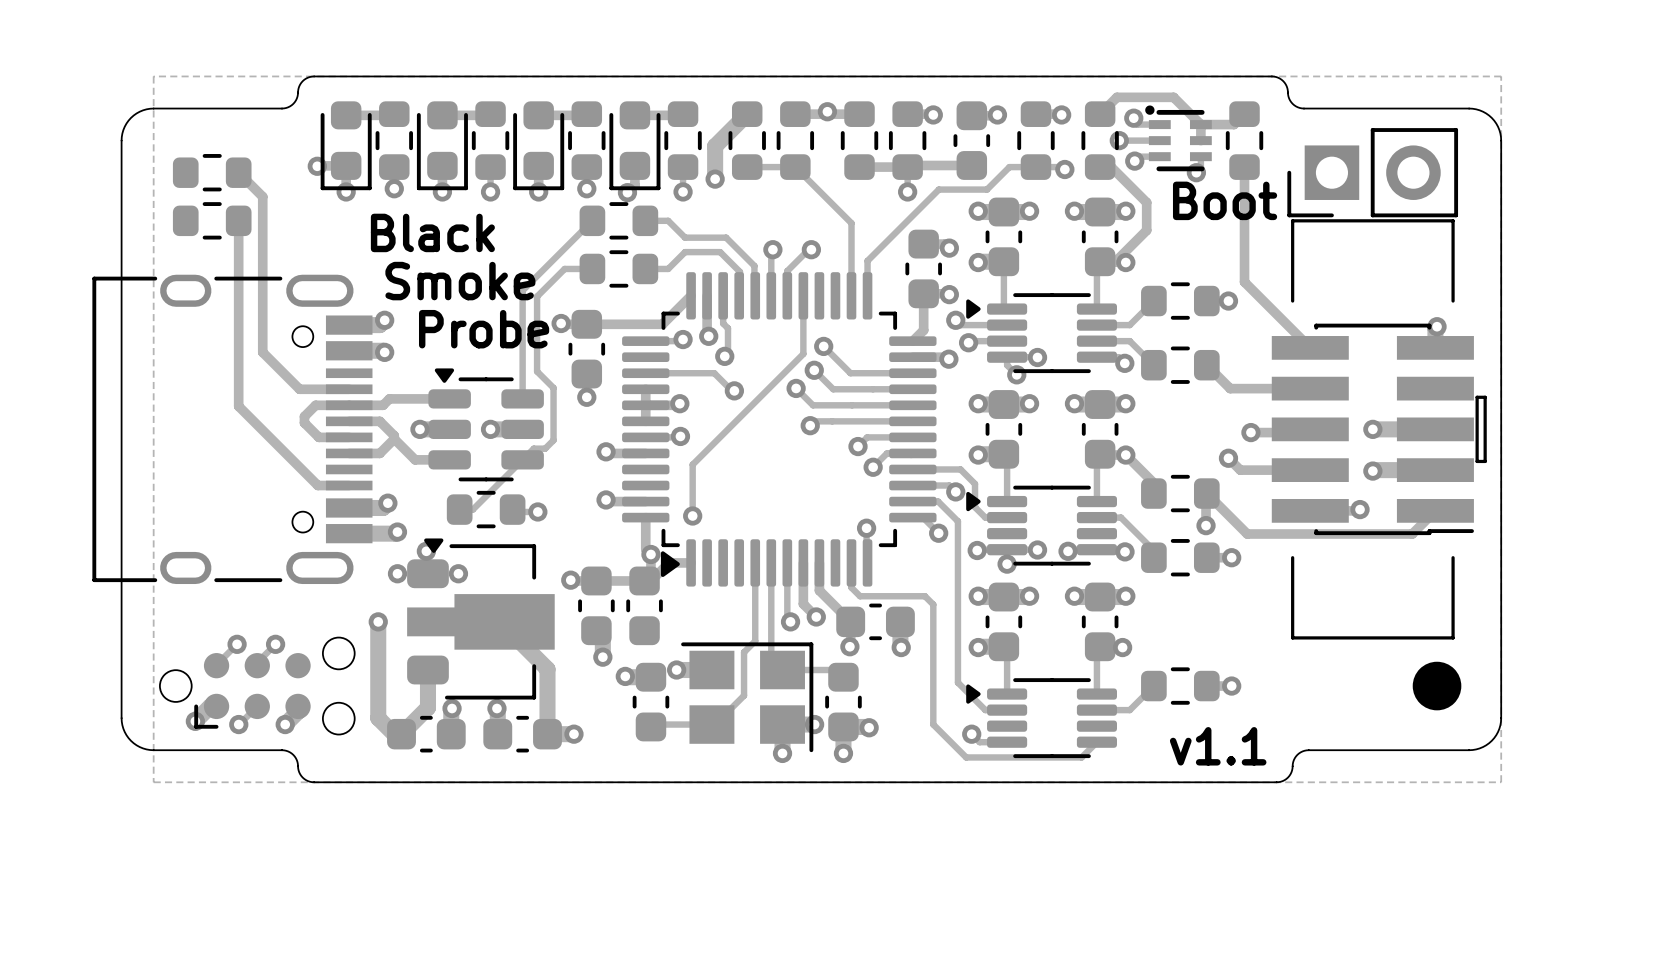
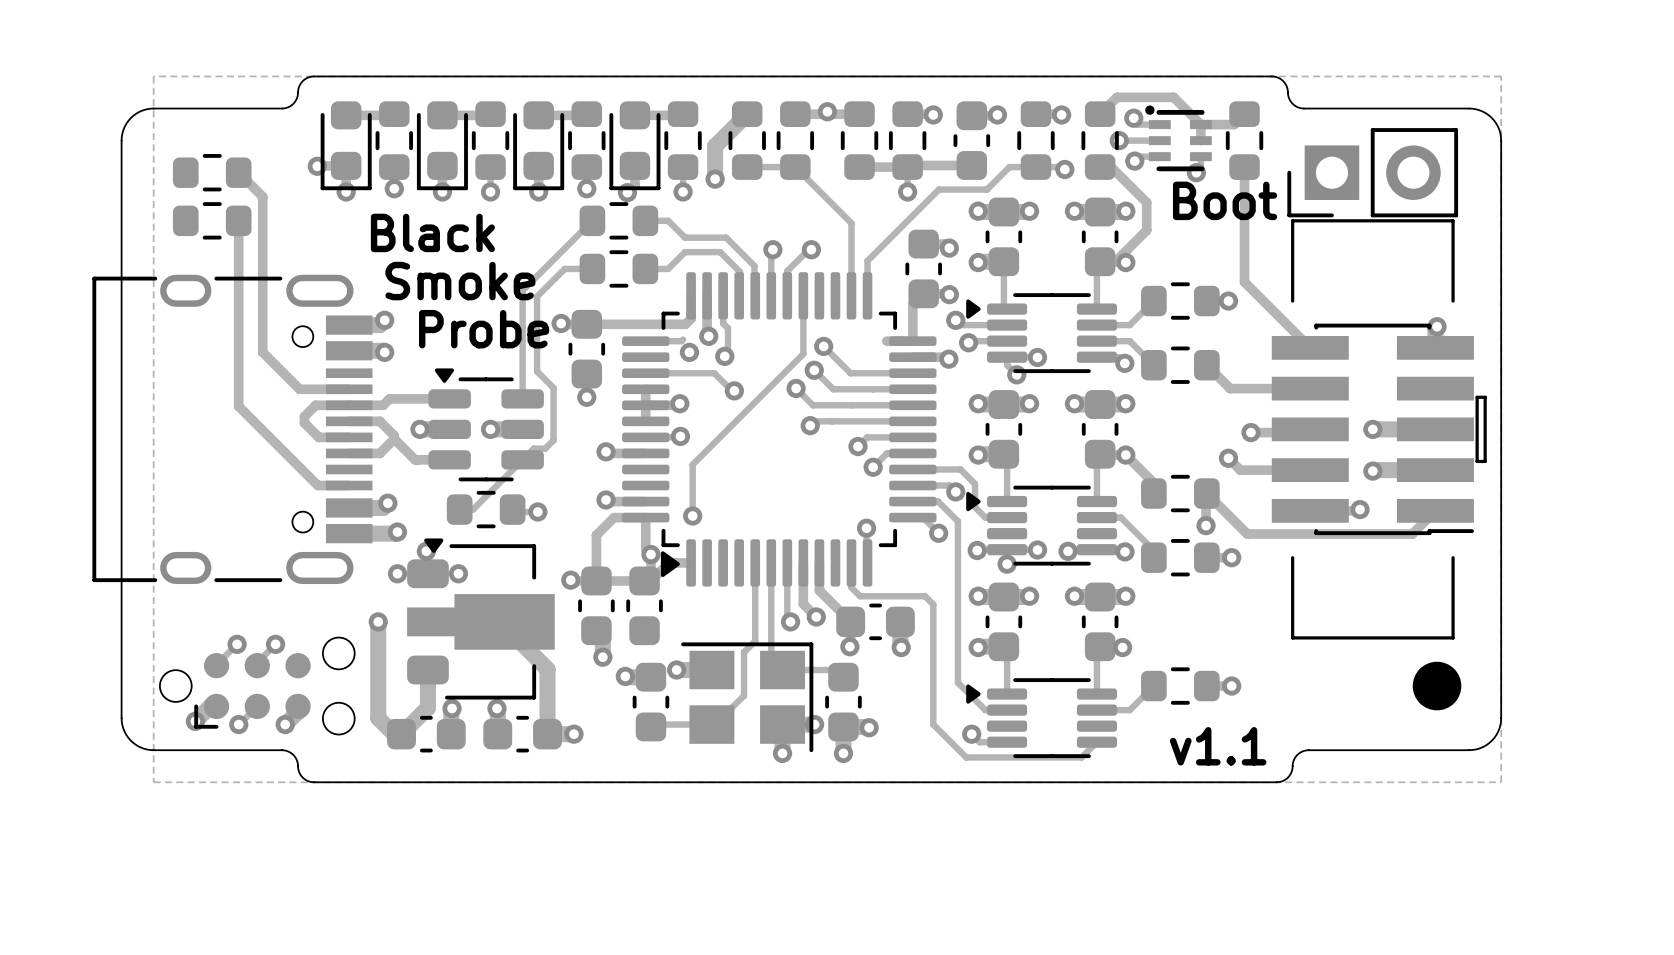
track: (923, 293) (923, 330) (912, 341) -> (923, 293) (912, 304) (912, 341) (886, 341)
track: (691, 295) (662, 324) -> (691, 295) (691, 318) (685, 324) (662, 324)
via position: (683, 339) -> (689, 352)
track: none -> (645, 517) (614, 517) (596, 535) (596, 580)

